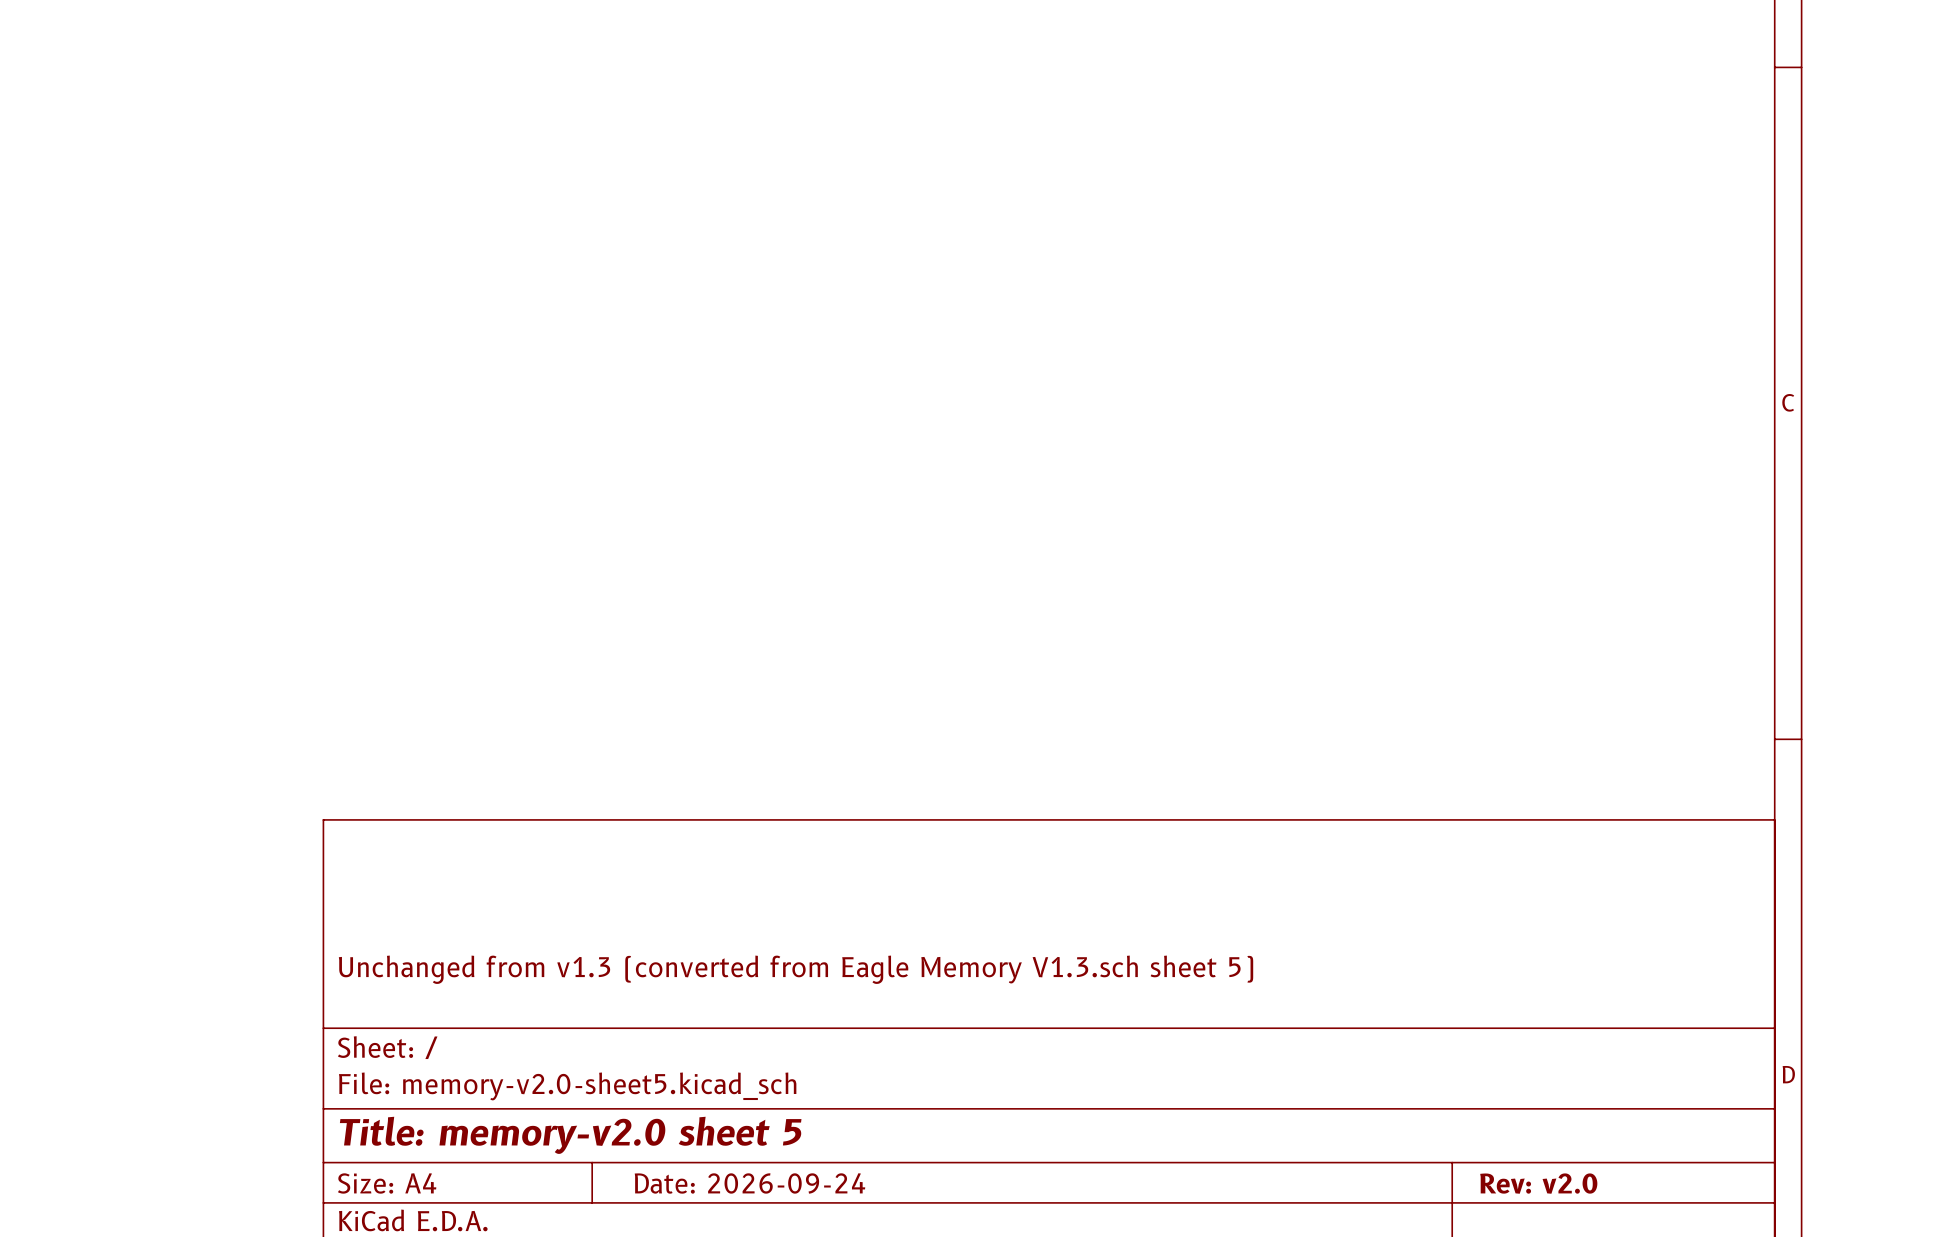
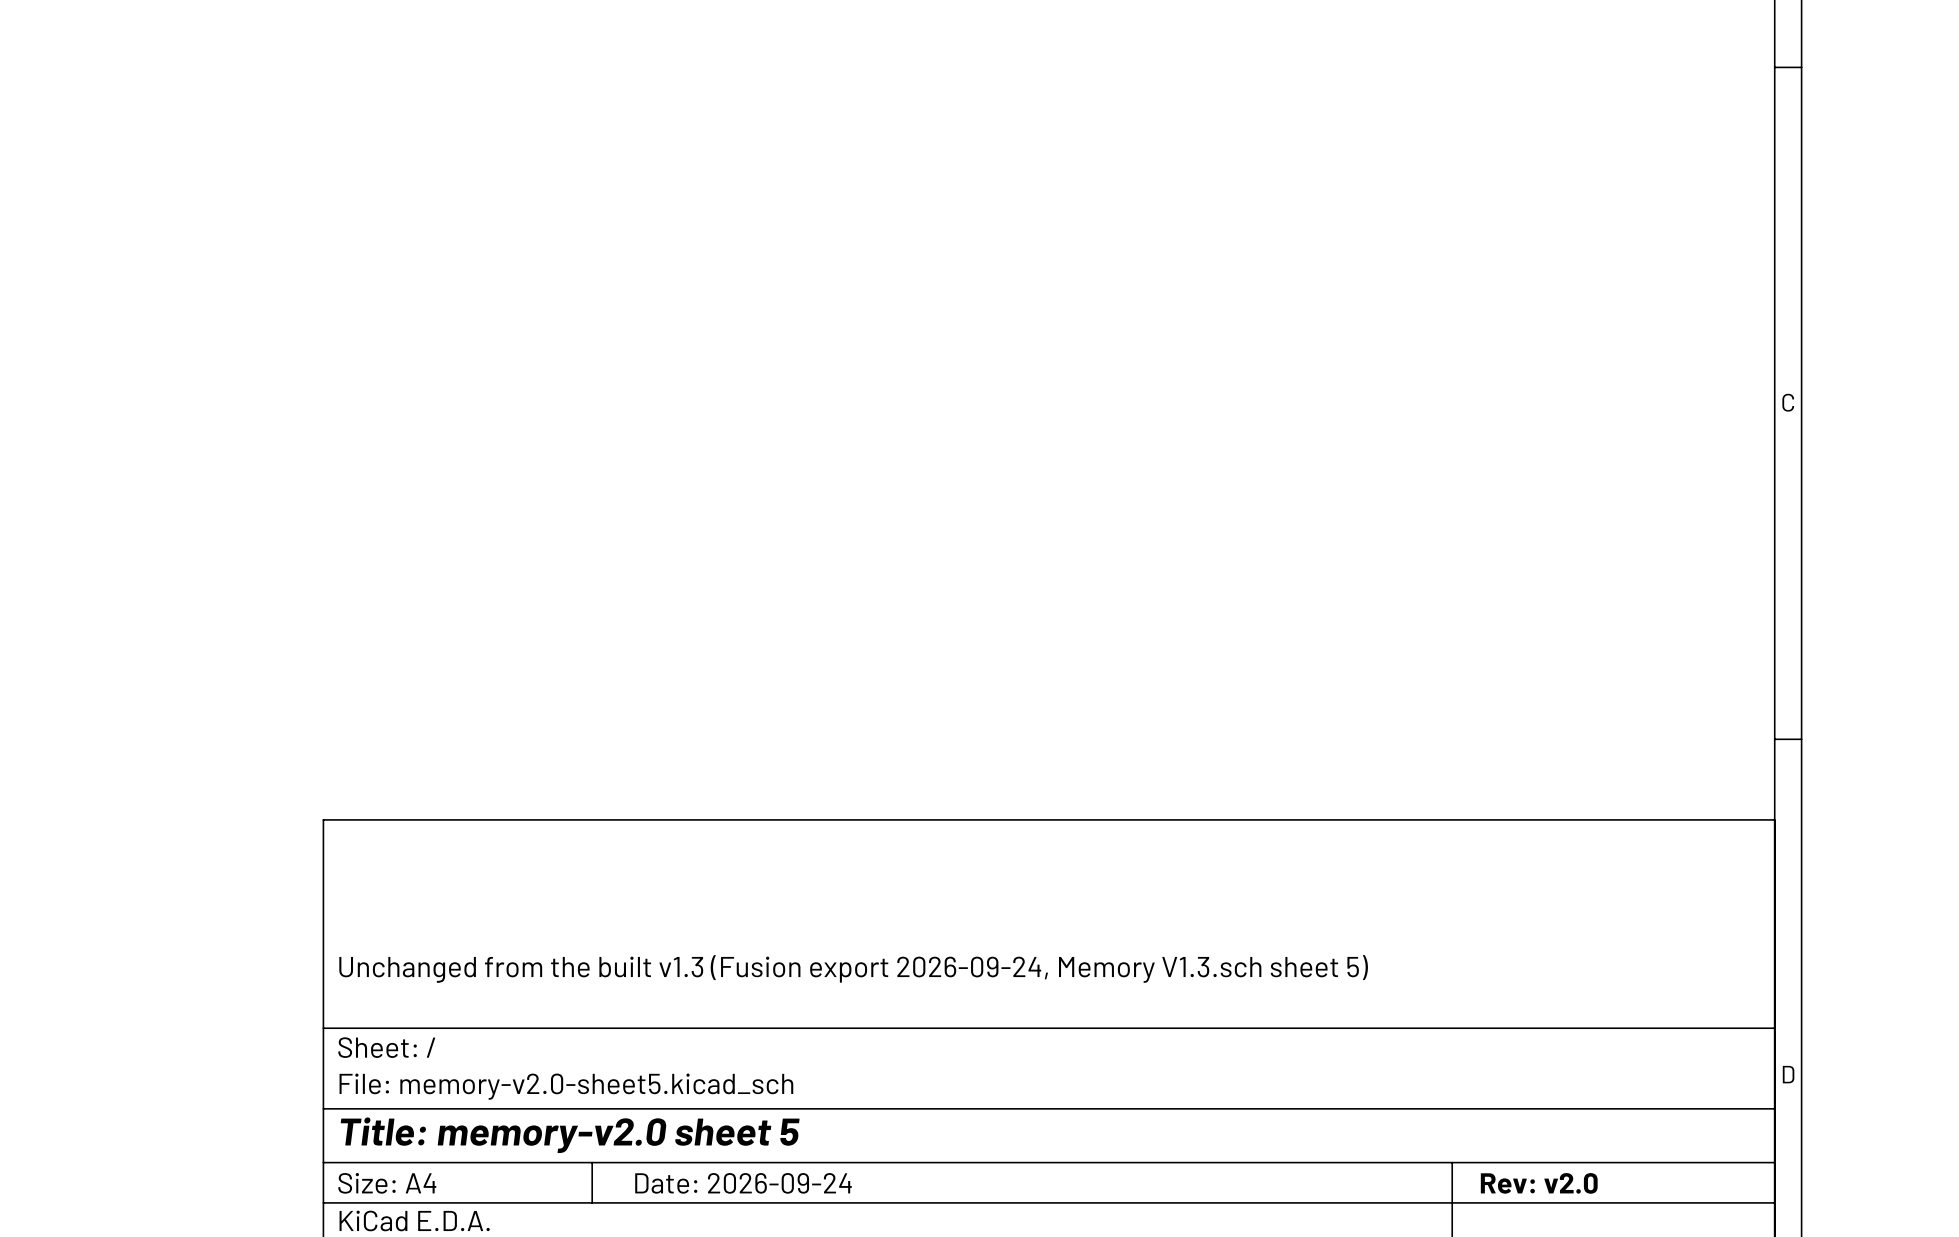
title block: Unchanged from v1.3 (converted from Eagle Memory V1.3.sch sheet 5) (796, 969) -> Unchanged from the built v1.3 (Fusion export 2026-09-24, Memory V1.3.sch sheet 5) (853, 968)

